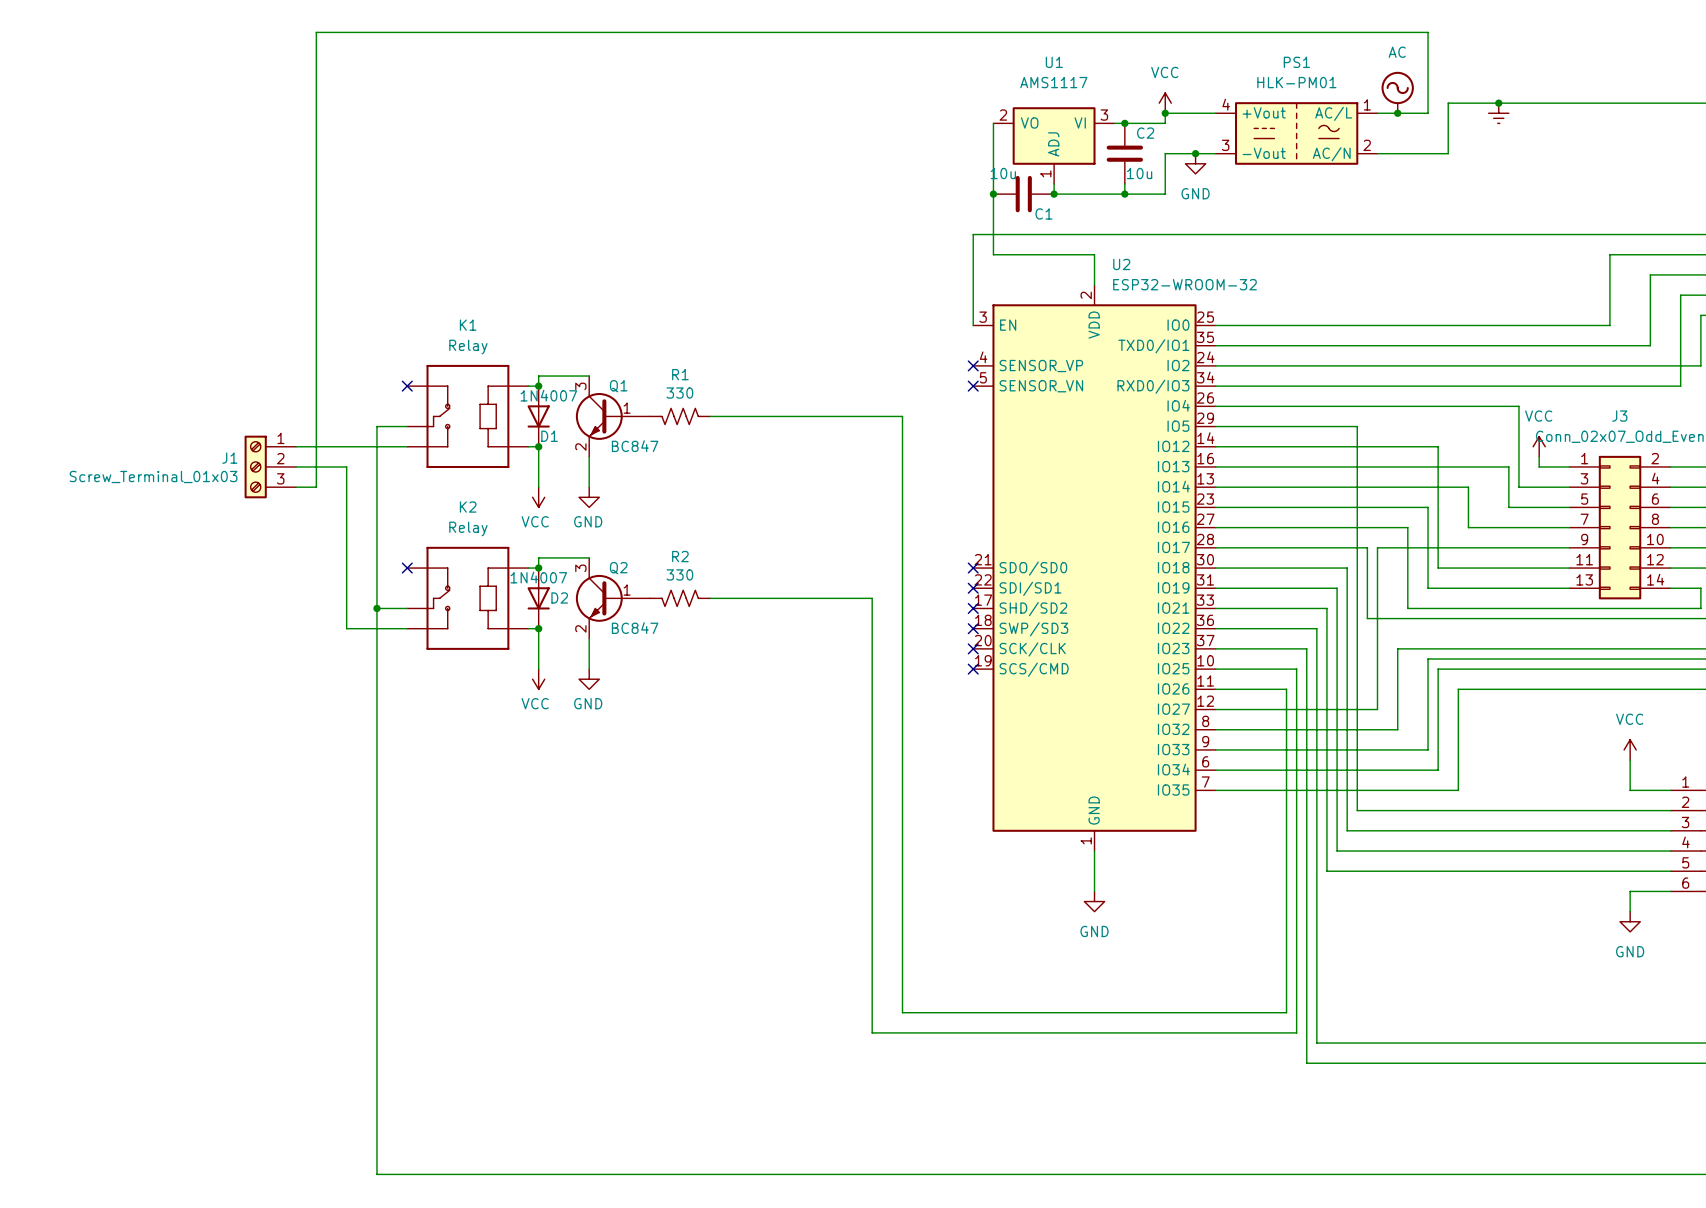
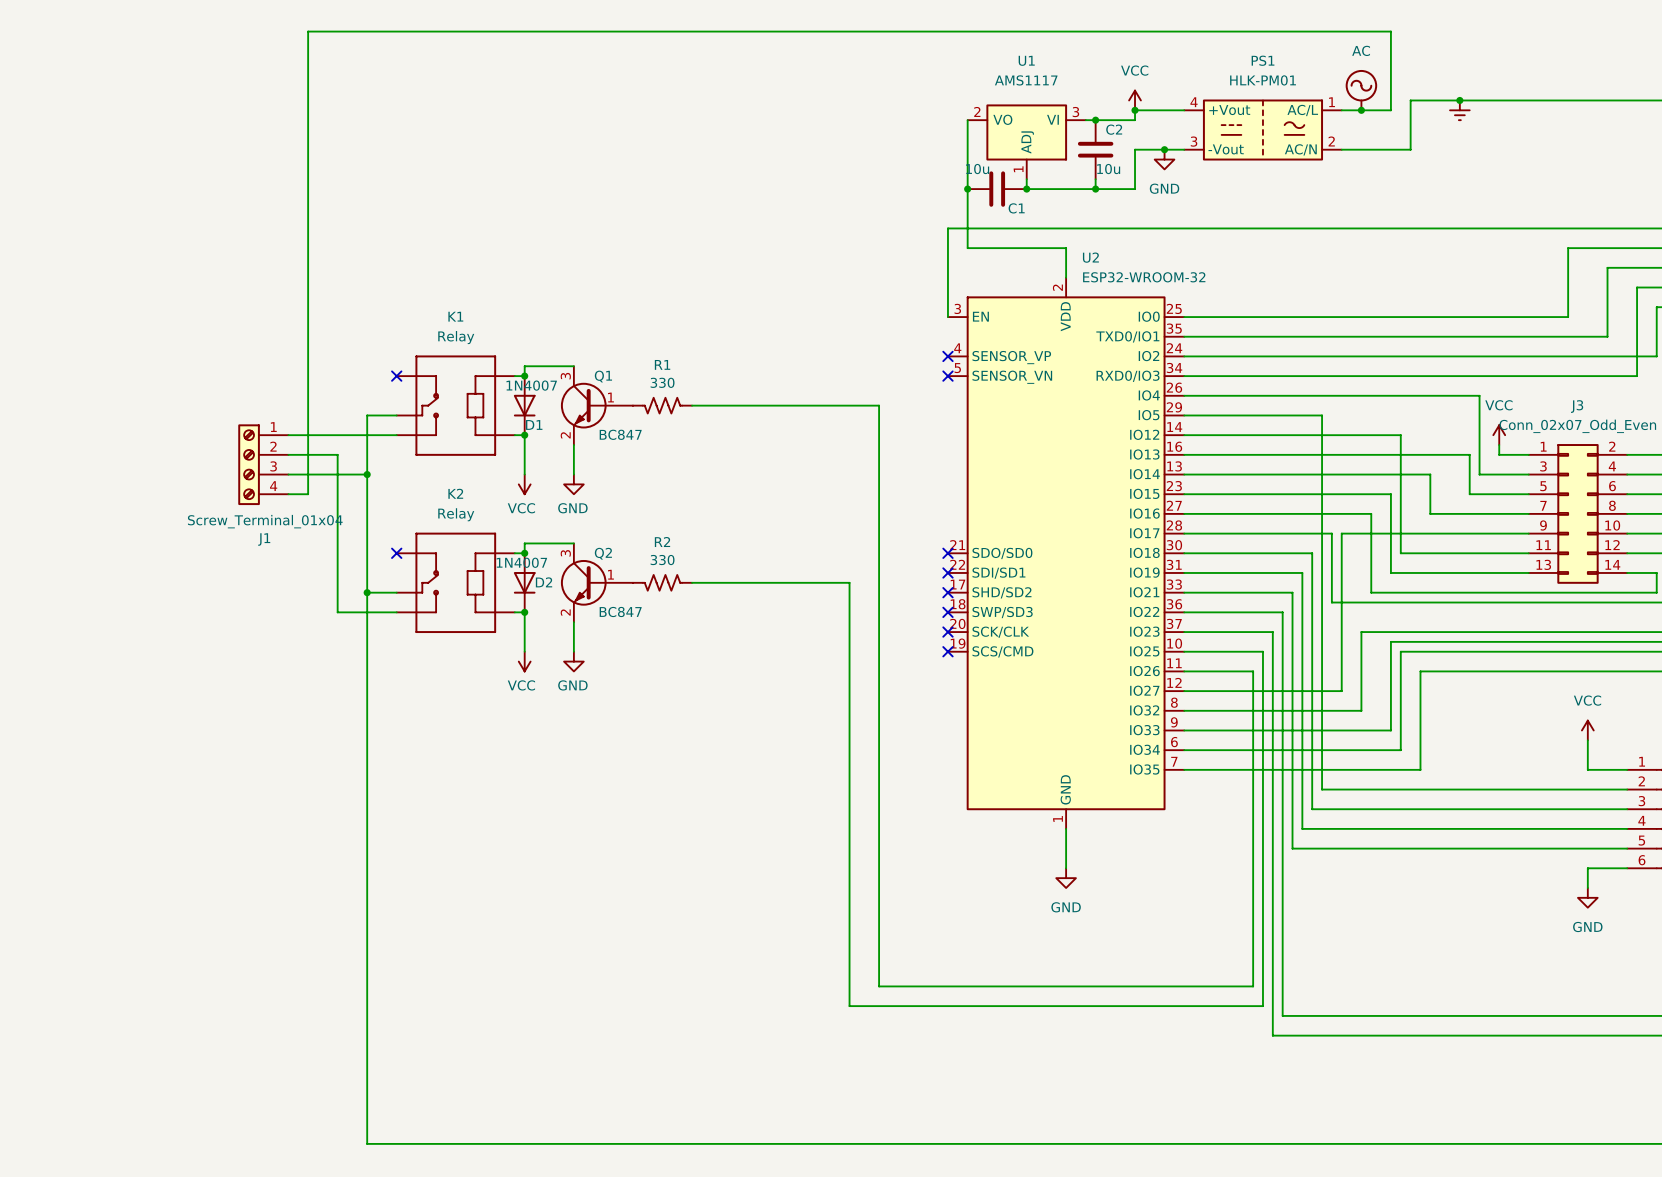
J1 symbol: [244, 435, 297, 499] -> [238, 424, 289, 506]
J1 name position: J1 (229, 458) -> J1 (264, 539)
J1 value: Screw_Terminal_01x03 (153, 476) -> Screw_Terminal_01x04 (265, 521)
wire: none -> (367, 474) (308, 474) (308, 494) (288, 494)
junction: none -> (367, 474)

